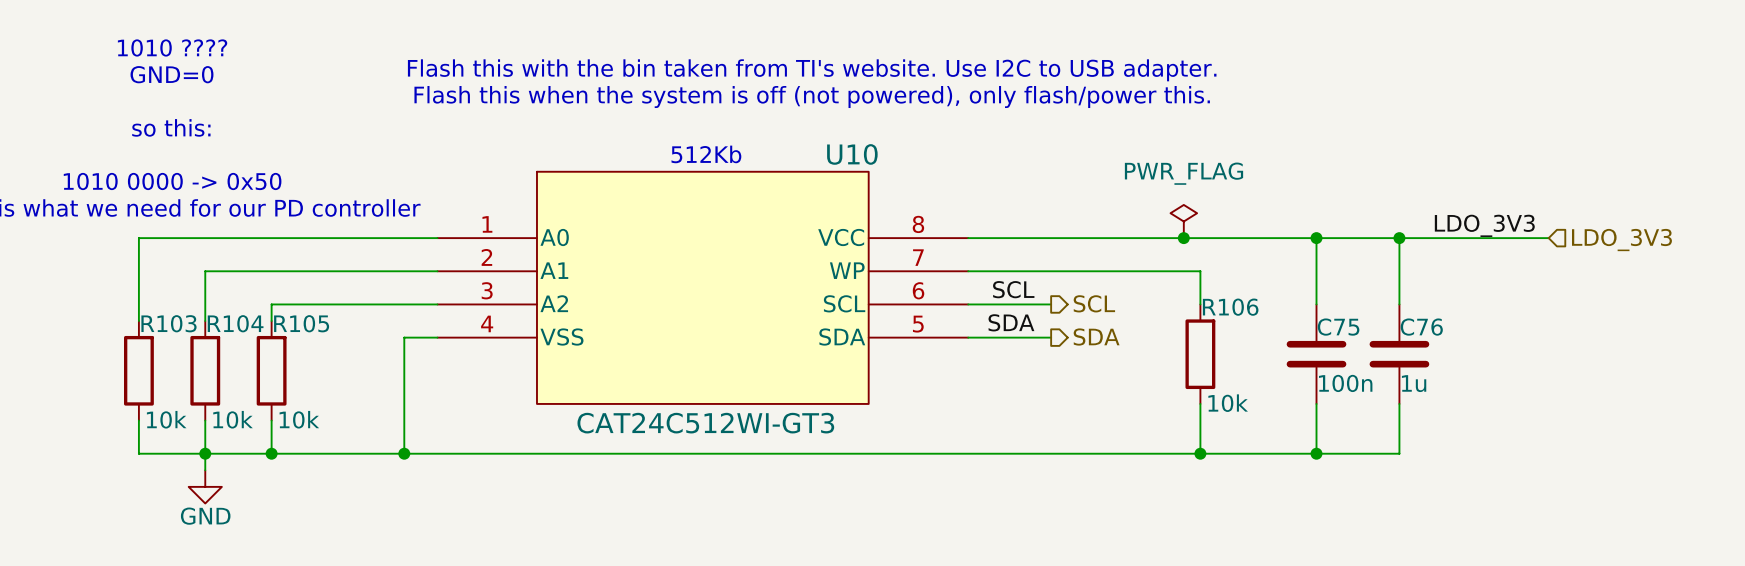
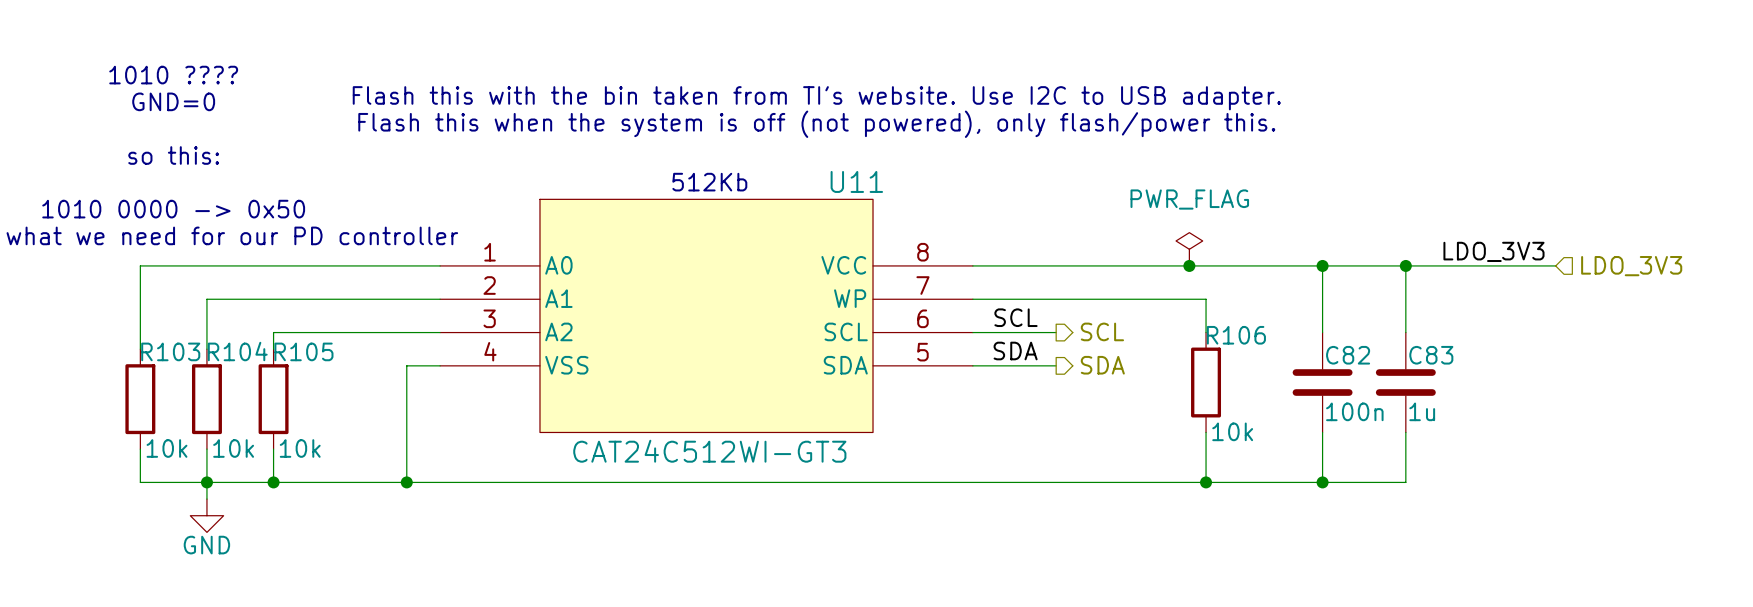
U10 name: U10 (852, 154) -> U11 (856, 181)
C75 name: C75 (1338, 327) -> C82 (1348, 355)
C76 name: C76 (1421, 327) -> C83 (1431, 355)

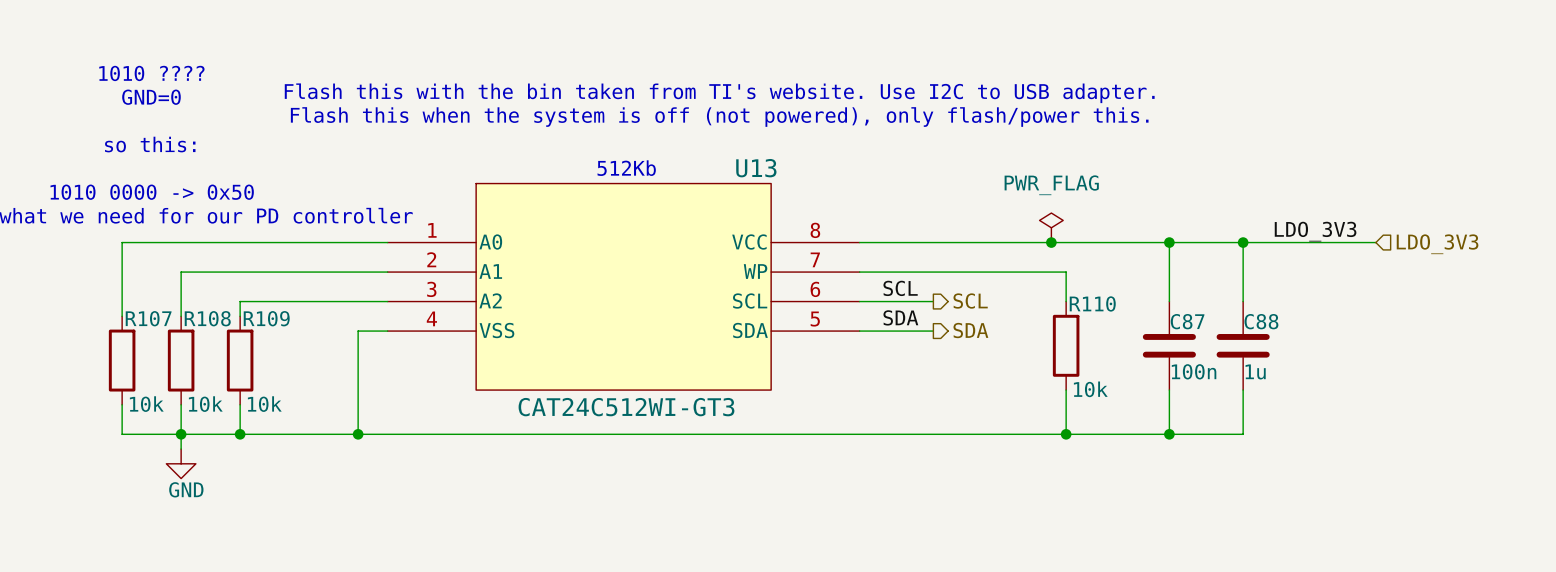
U11 name: U11 (856, 181) -> U13 (756, 168)
R106 name: R106 (1236, 335) -> R110 (1092, 303)
R103 name: R103 (170, 351) -> R107 (148, 318)
R104 name: R104 (237, 351) -> R108 (207, 318)
R105 name: R105 (303, 351) -> R109 (266, 318)
C82 name: C82 (1348, 355) -> C87 (1187, 321)
C83 name: C83 (1431, 355) -> C88 (1261, 321)

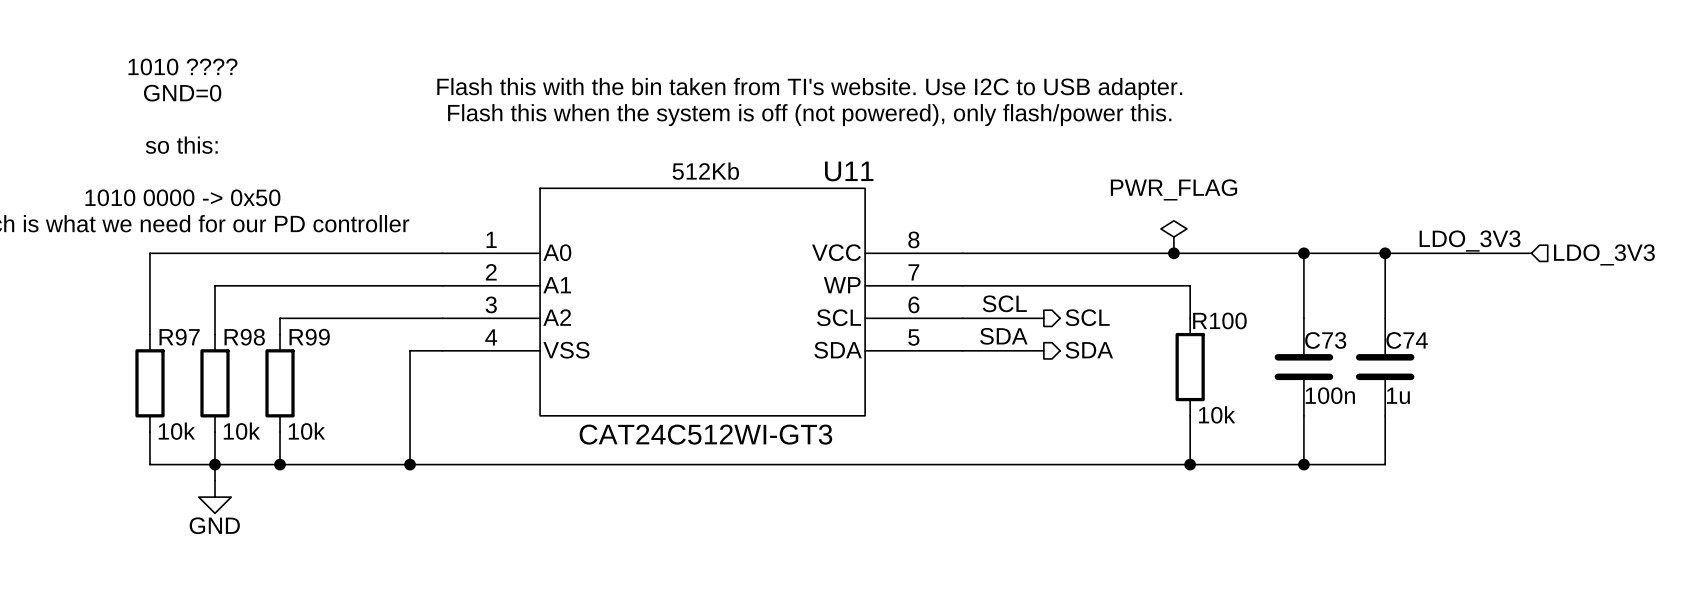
U13 name: U13 (756, 168) -> U11 (849, 171)
R110 name: R110 (1092, 303) -> R100 (1219, 320)
R107 name: R107 (148, 318) -> R97 (179, 337)
R108 name: R108 (207, 318) -> R98 (244, 337)
R109 name: R109 (266, 318) -> R99 (309, 337)
C87 name: C87 (1187, 321) -> C73 (1325, 340)
C88 name: C88 (1261, 321) -> C74 (1407, 340)

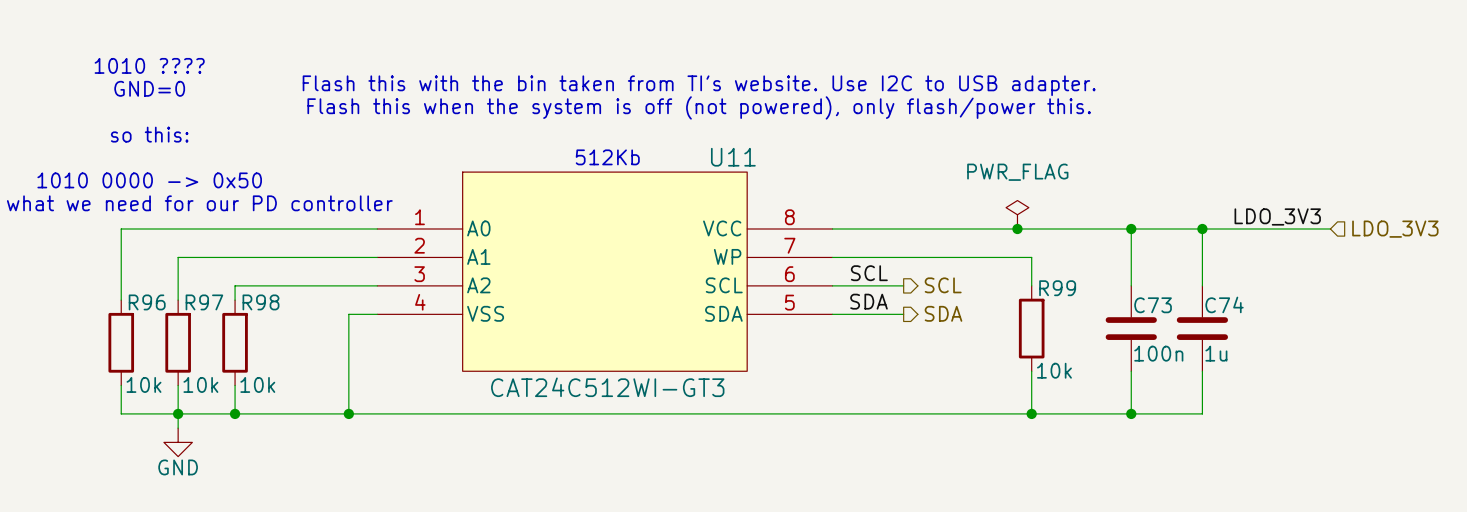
R100 name: R100 (1219, 320) -> R99 (1057, 288)
R97 name: R97 (179, 337) -> R96 (147, 302)
R98 name: R98 (244, 337) -> R97 (204, 302)
R99 name: R99 (309, 337) -> R98 (260, 302)

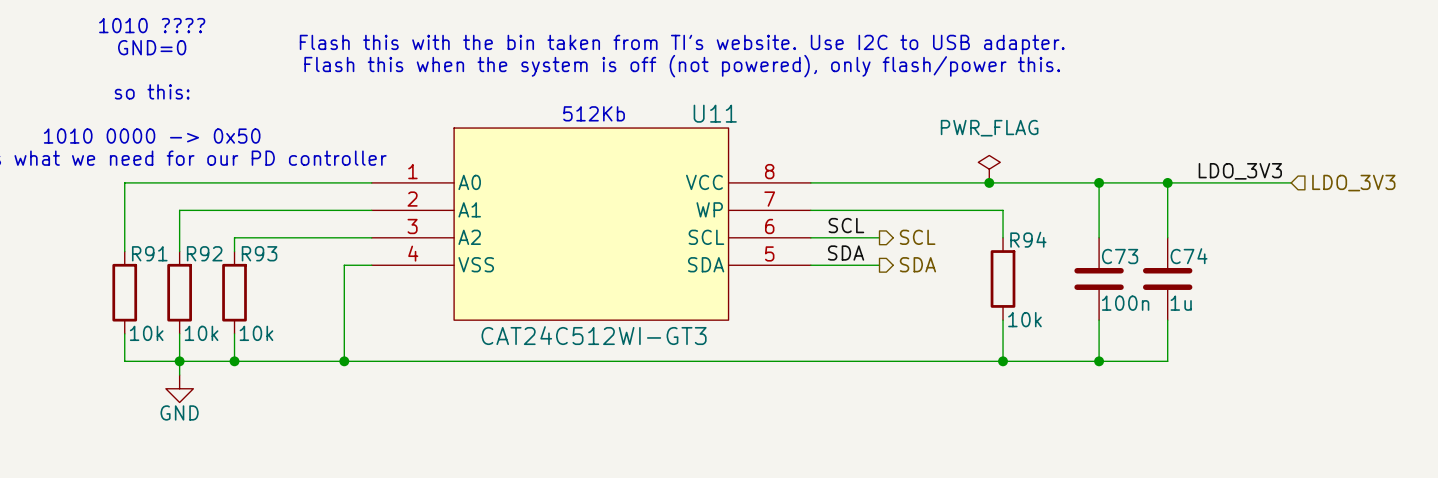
R99 name: R99 (1057, 288) -> R94 (1028, 239)
R96 name: R96 (147, 302) -> R91 (149, 253)
R97 name: R97 (204, 302) -> R92 (204, 253)
R98 name: R98 (260, 302) -> R93 (259, 253)

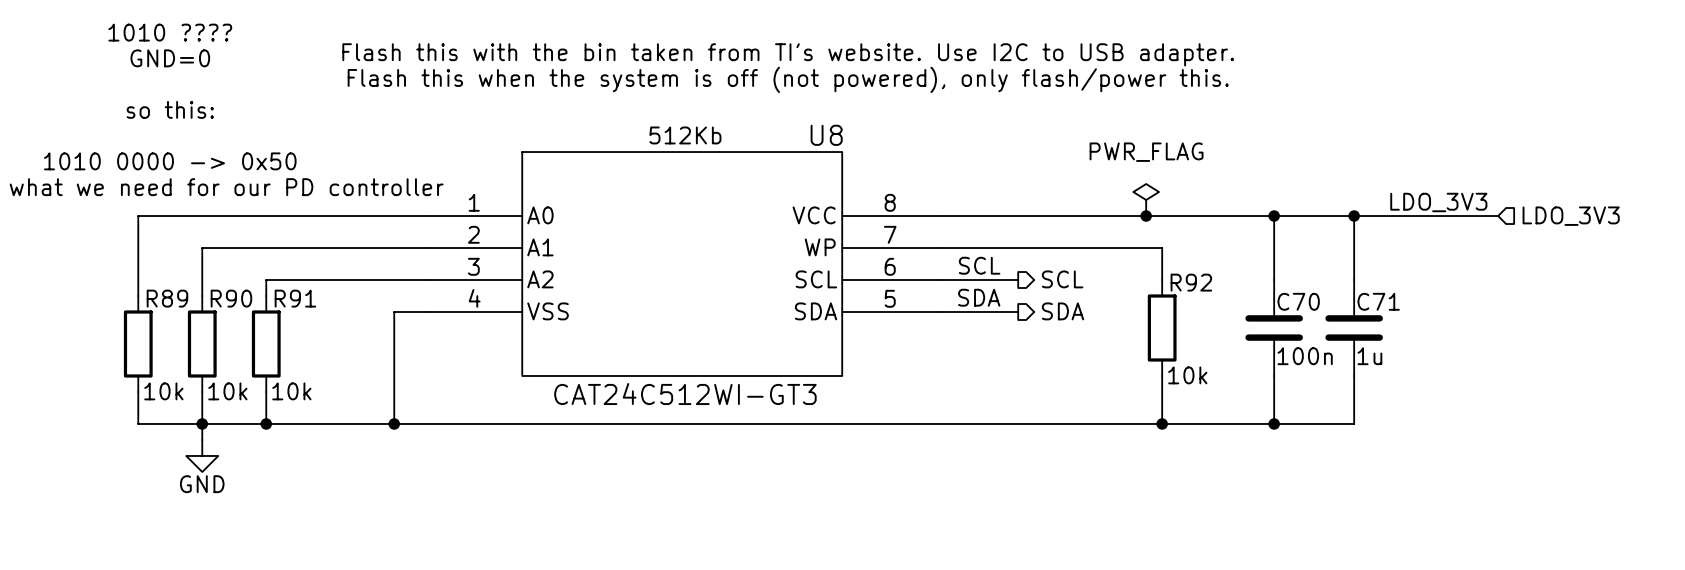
U11 name: U11 (715, 113) -> U8 (826, 135)
R94 name: R94 (1028, 239) -> R92 (1191, 282)
R91 name: R91 (149, 253) -> R89 (167, 298)
R92 name: R92 (204, 253) -> R90 (231, 298)
R93 name: R93 (259, 253) -> R91 (295, 298)
C73 name: C73 (1120, 256) -> C70 (1298, 301)
C74 name: C74 (1189, 256) -> C71 (1378, 301)

